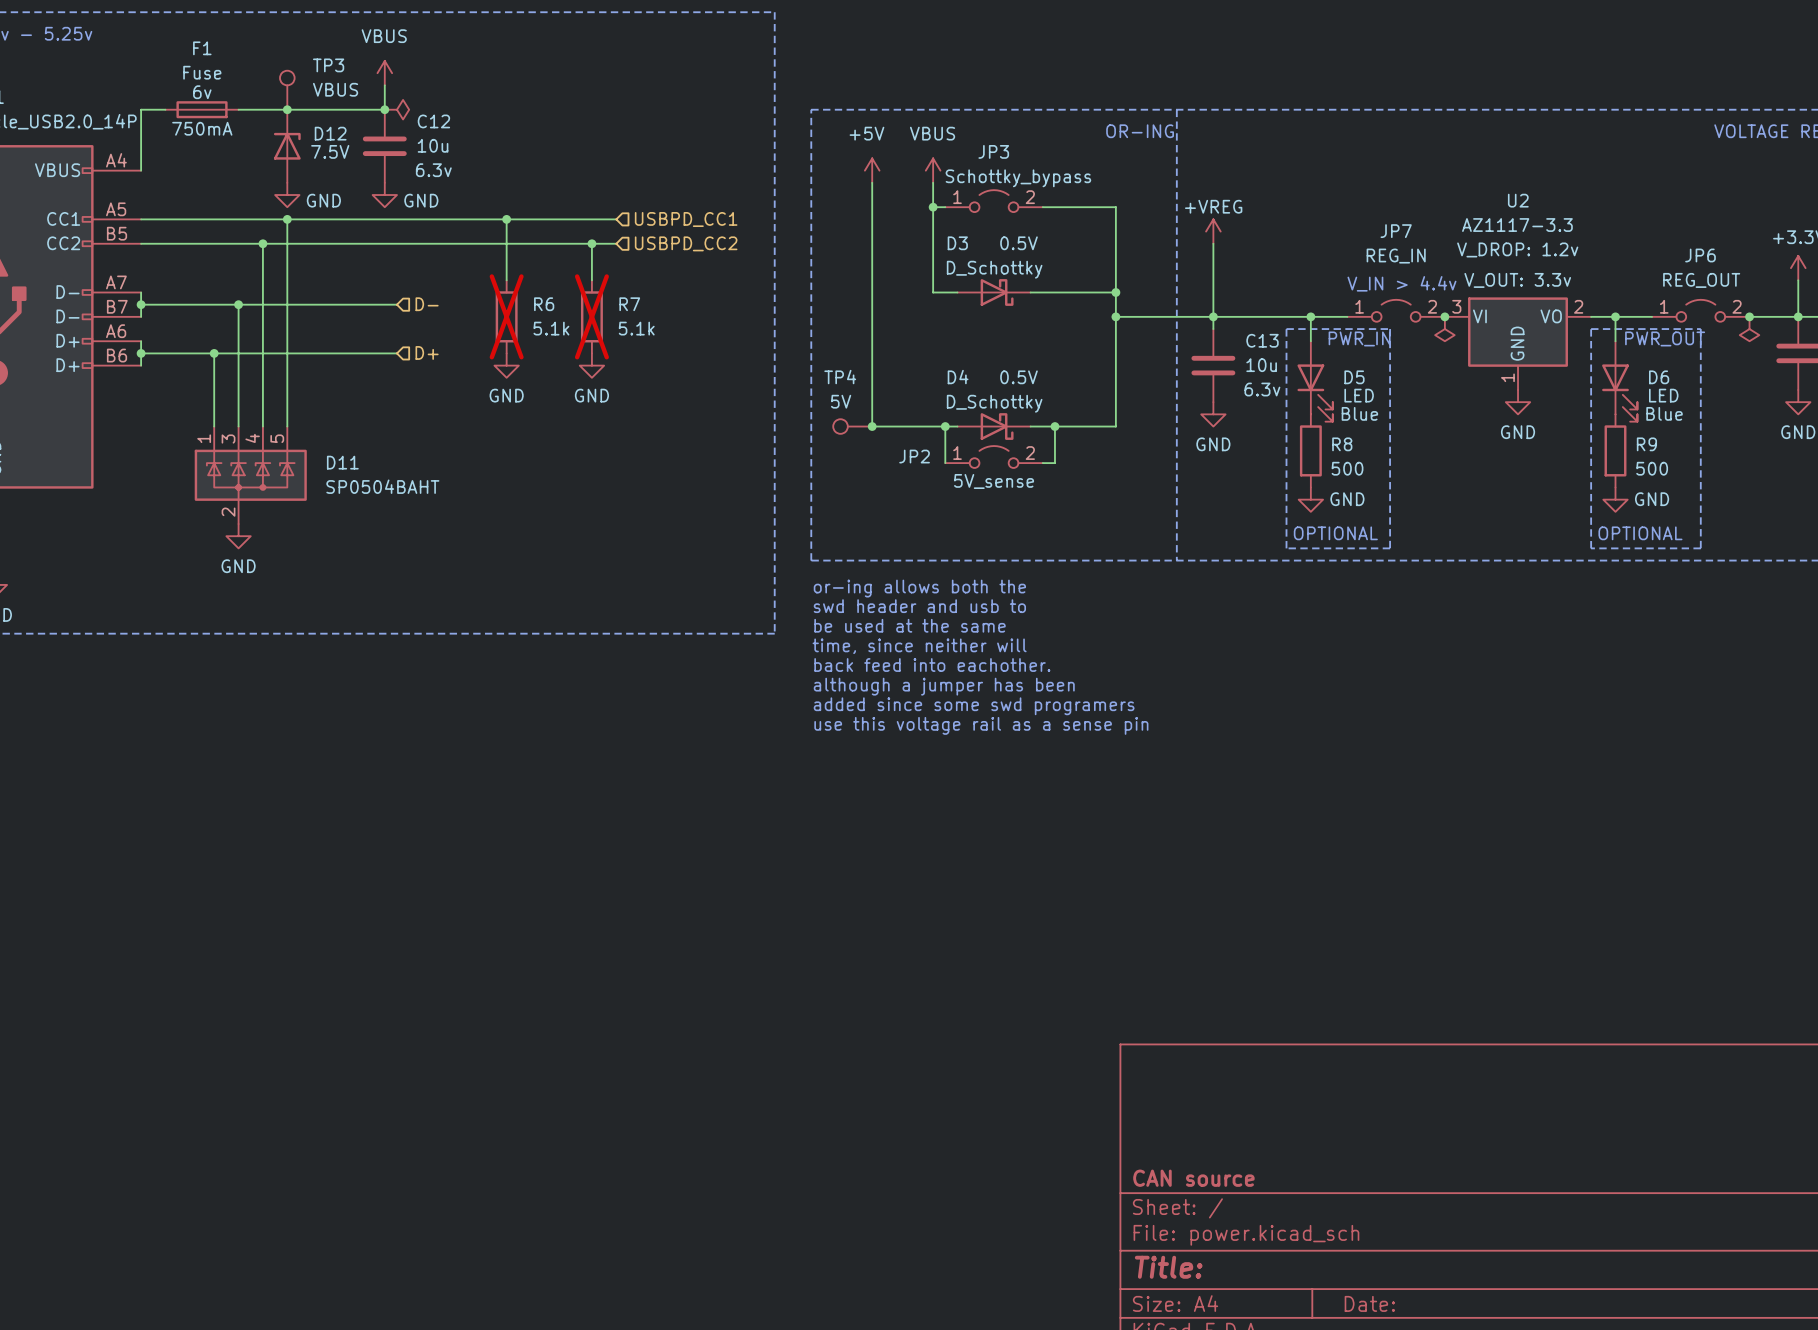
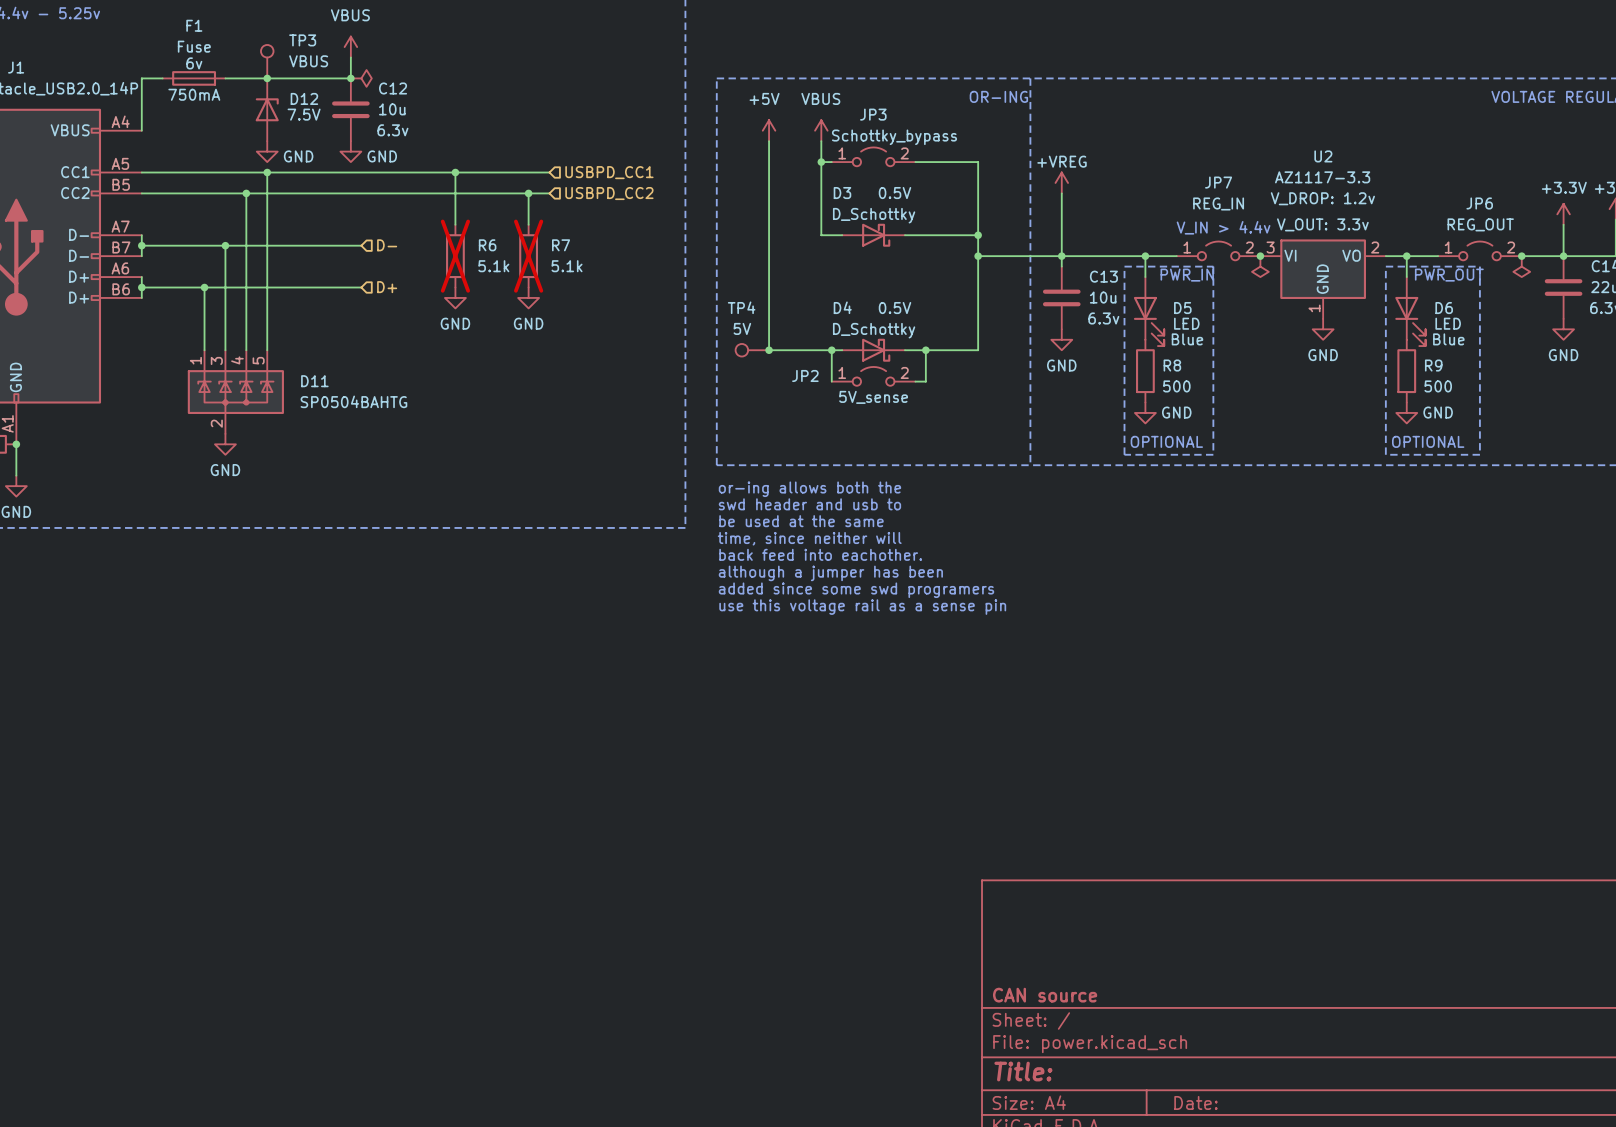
D11 value: SP0504BAHT (382, 486) -> SP0504BAHTG (353, 401)

